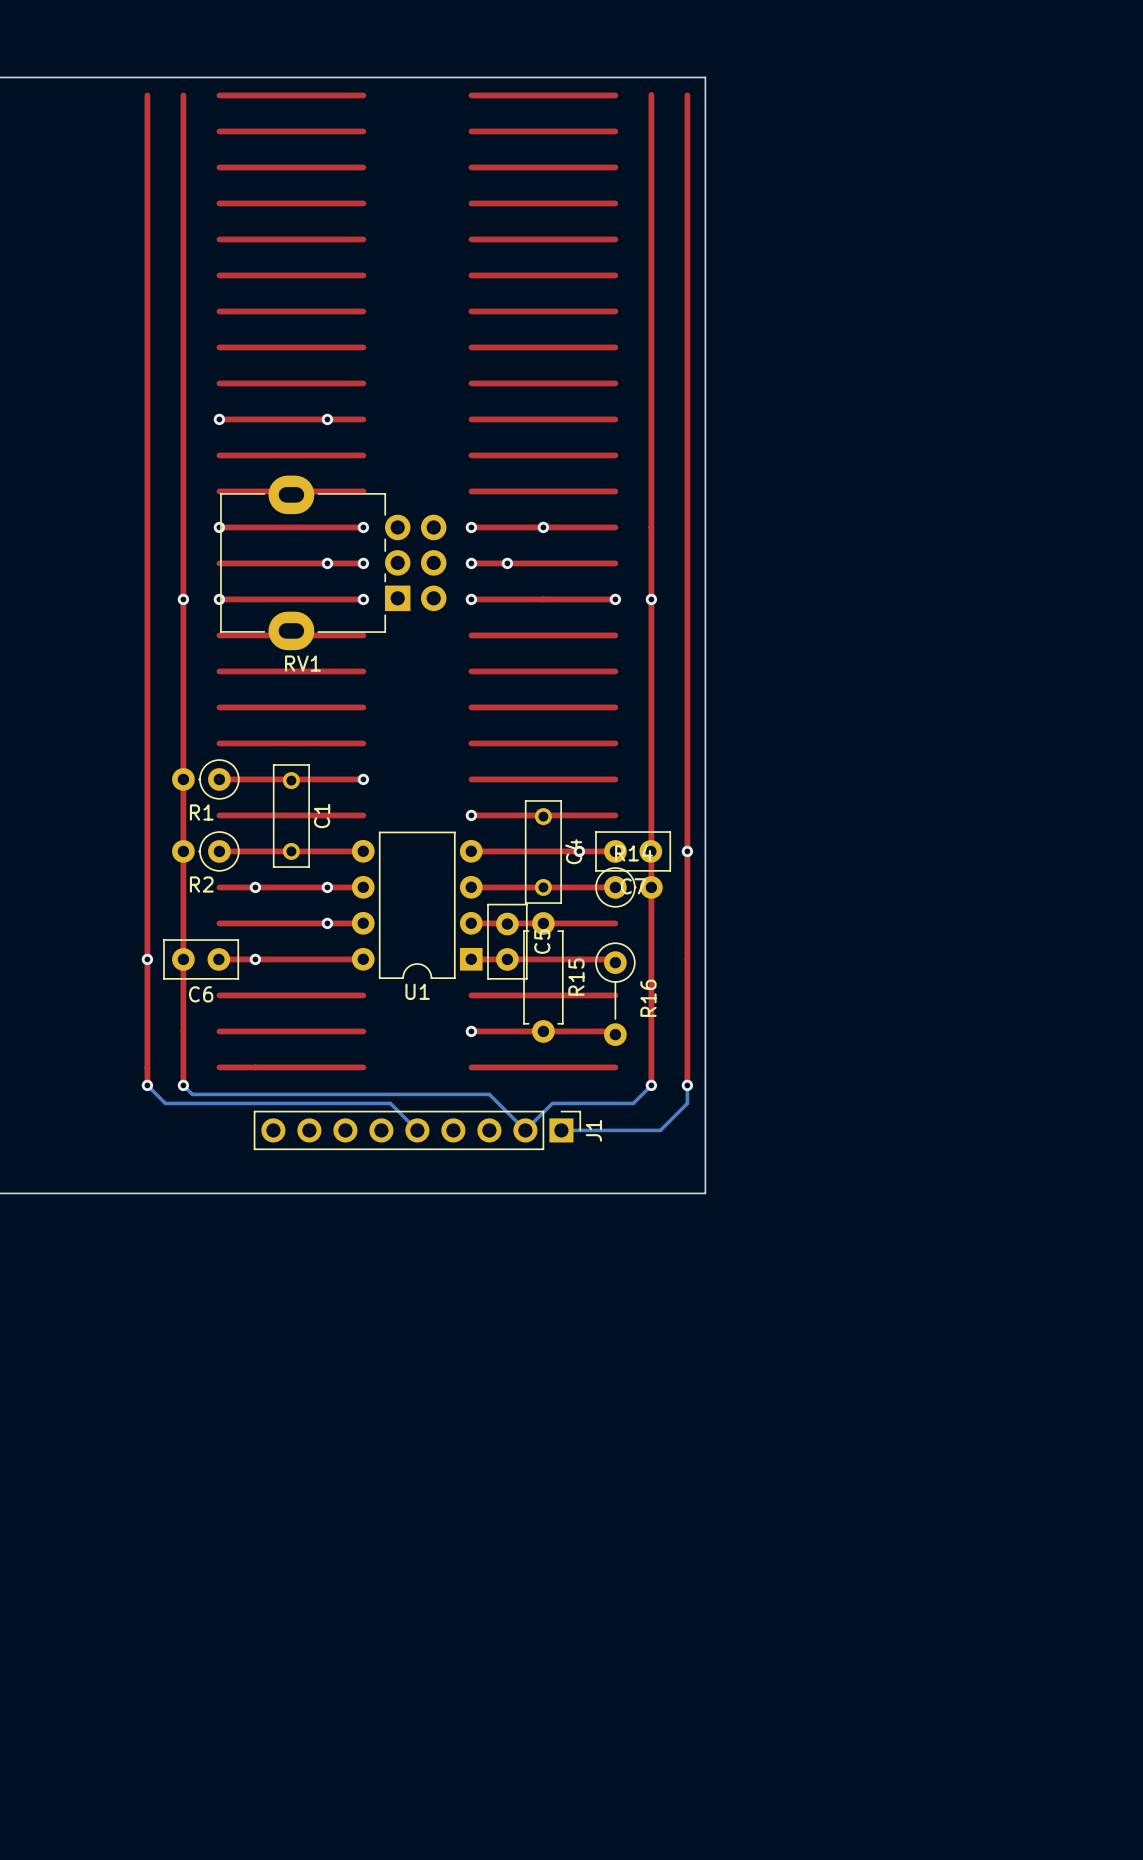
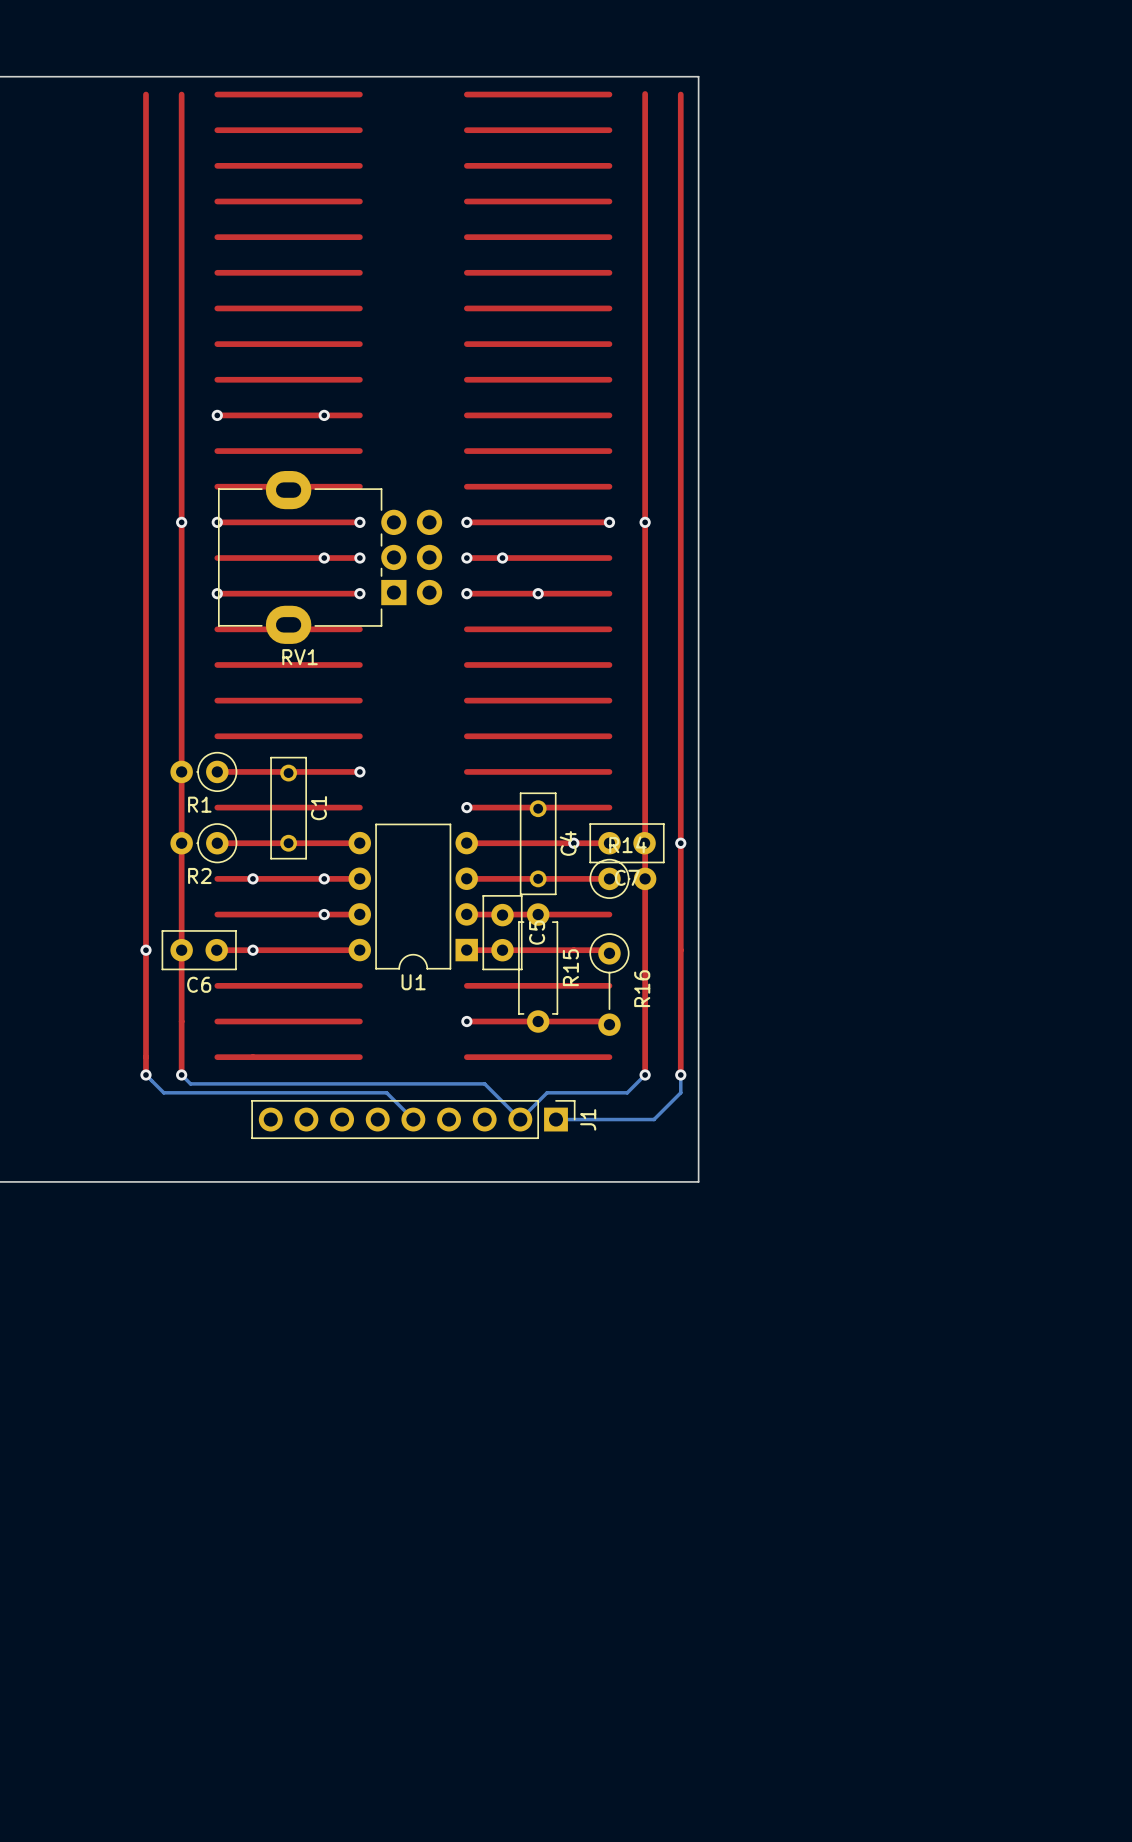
via: (543, 527) -> none
via: none -> (609, 522)
via: none -> (645, 522)
via position: (183, 599) -> (181, 522)
via: none -> (538, 593)
via: (615, 599) -> none
via: (651, 599) -> none

